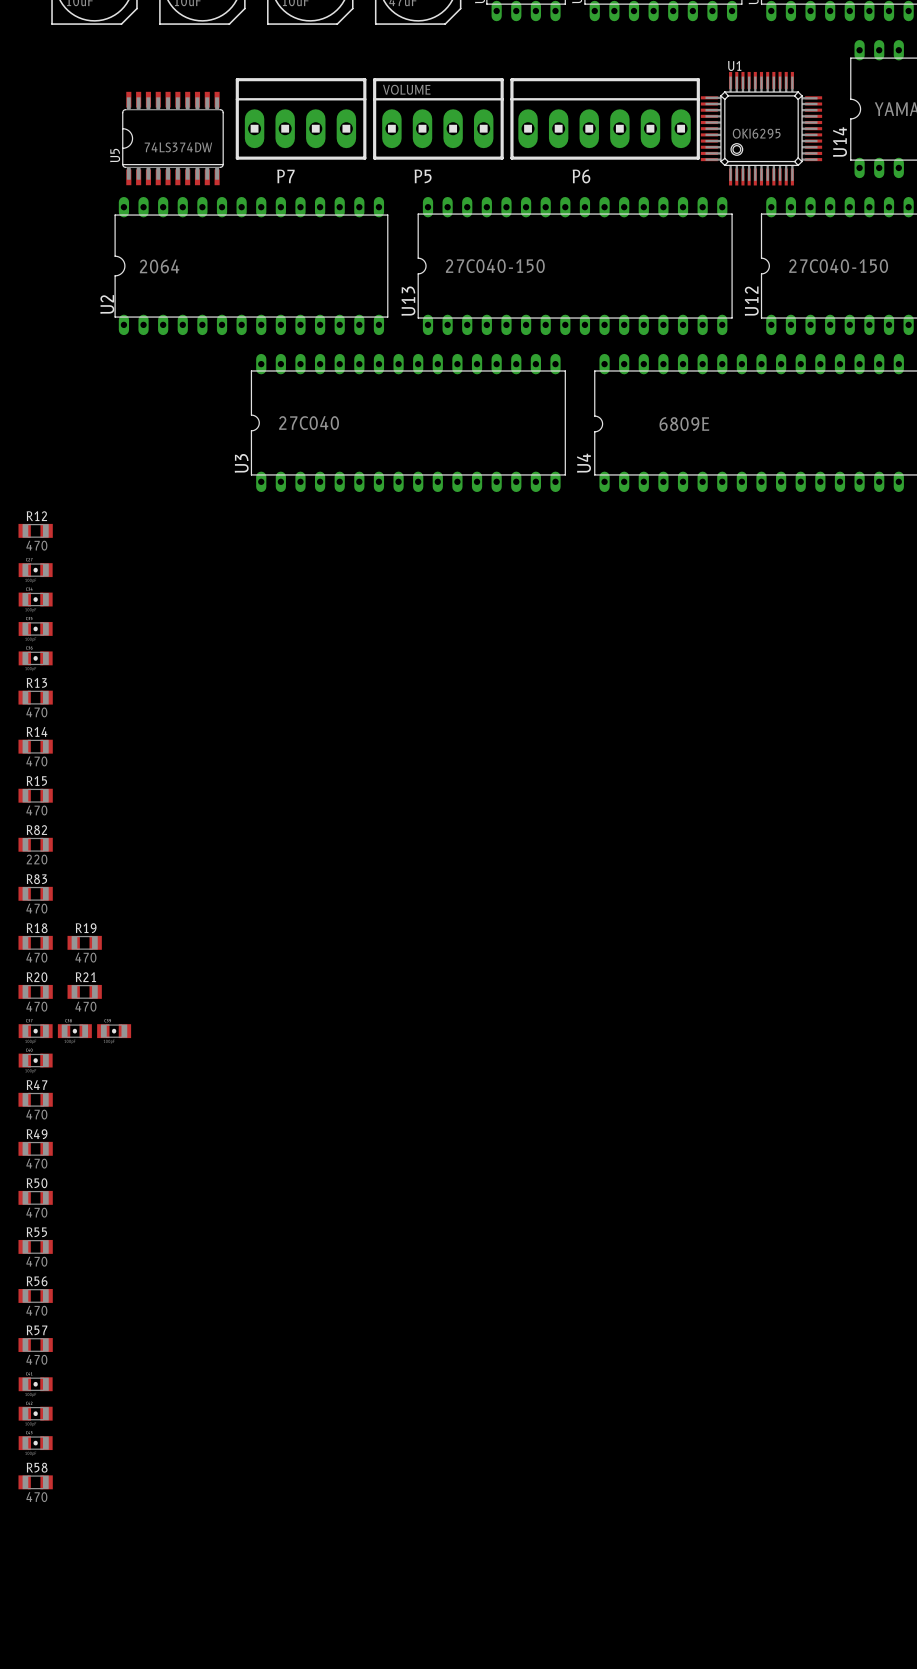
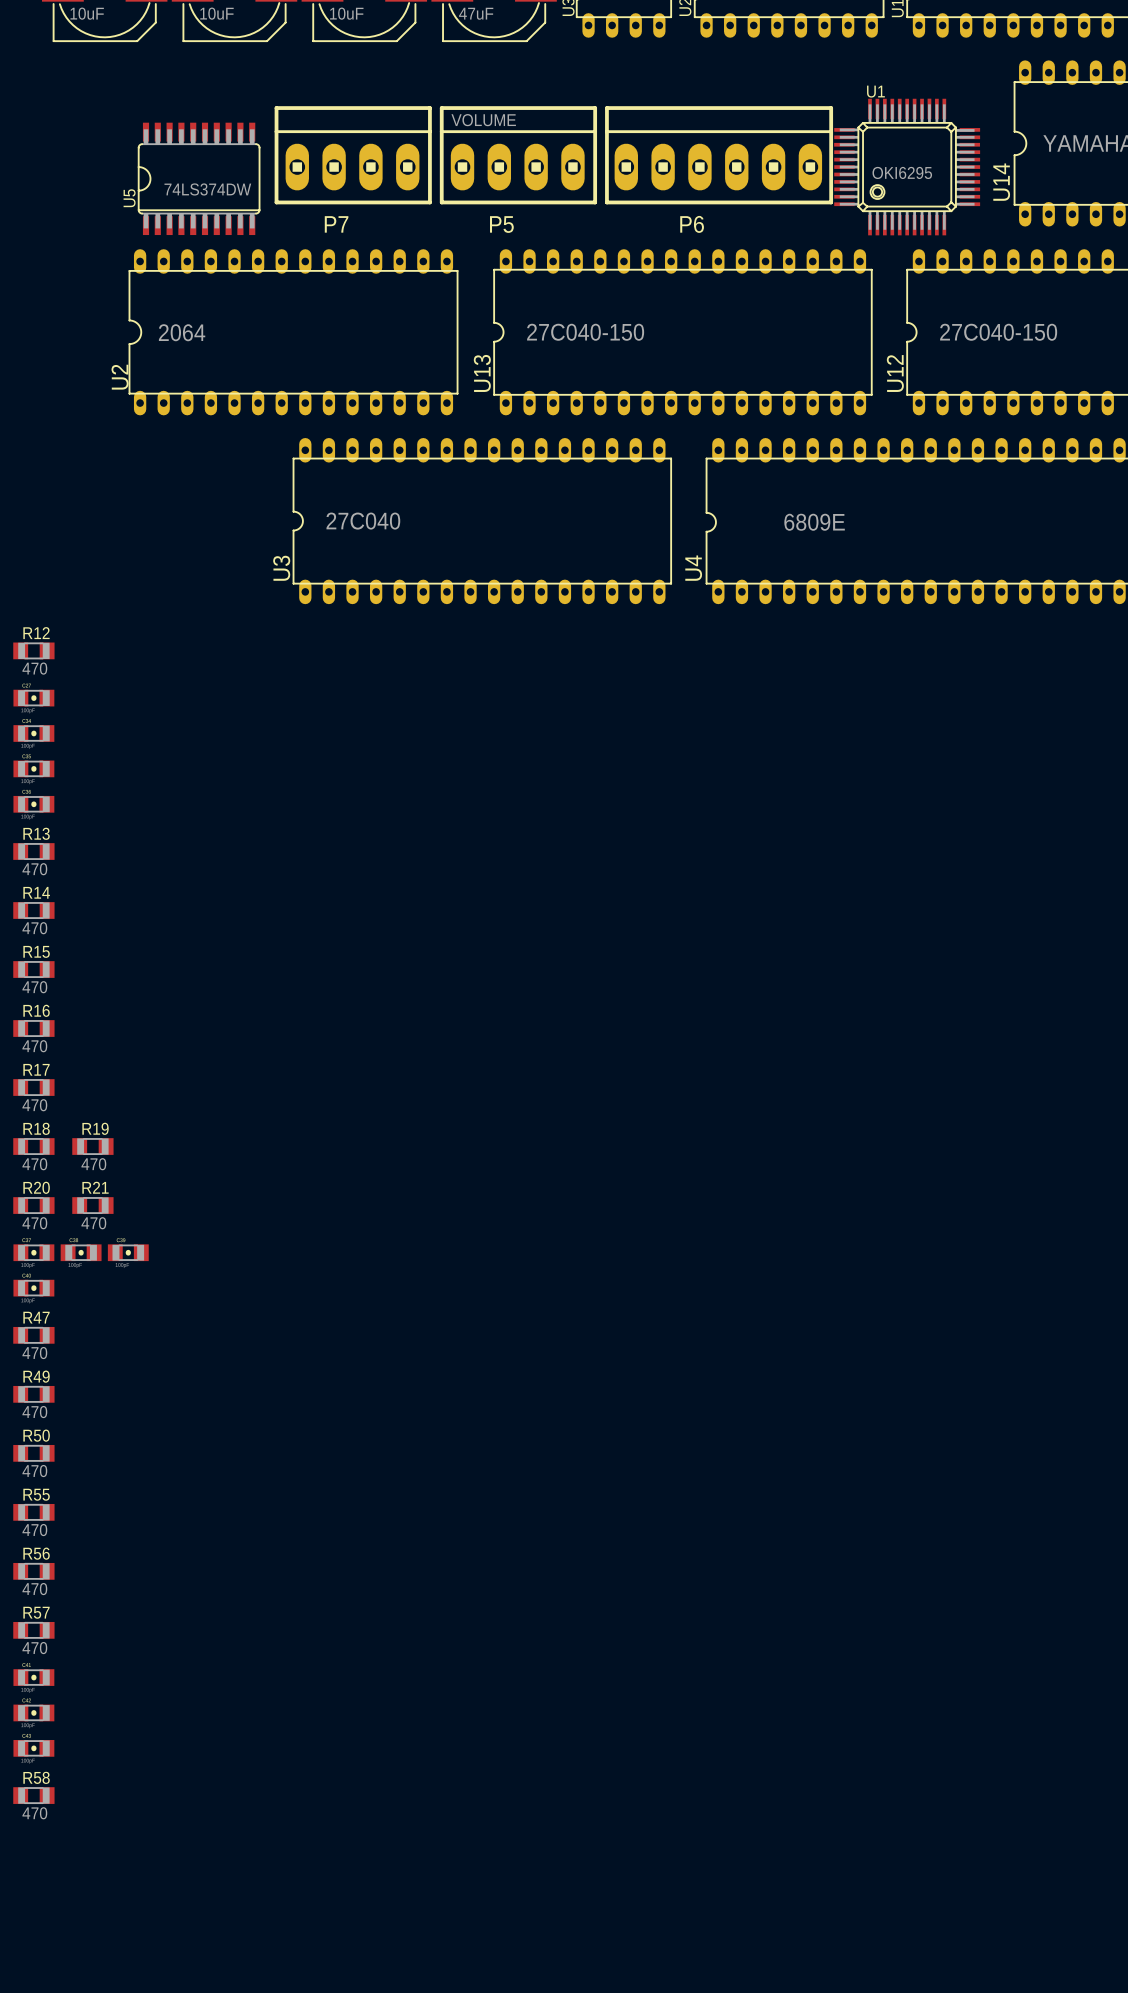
R82 name: R82 (36, 830) -> R16 (36, 1010)
R82 value: 220 (37, 859) -> 470 (34, 1046)
R83 name: R83 (36, 879) -> R17 (36, 1069)

